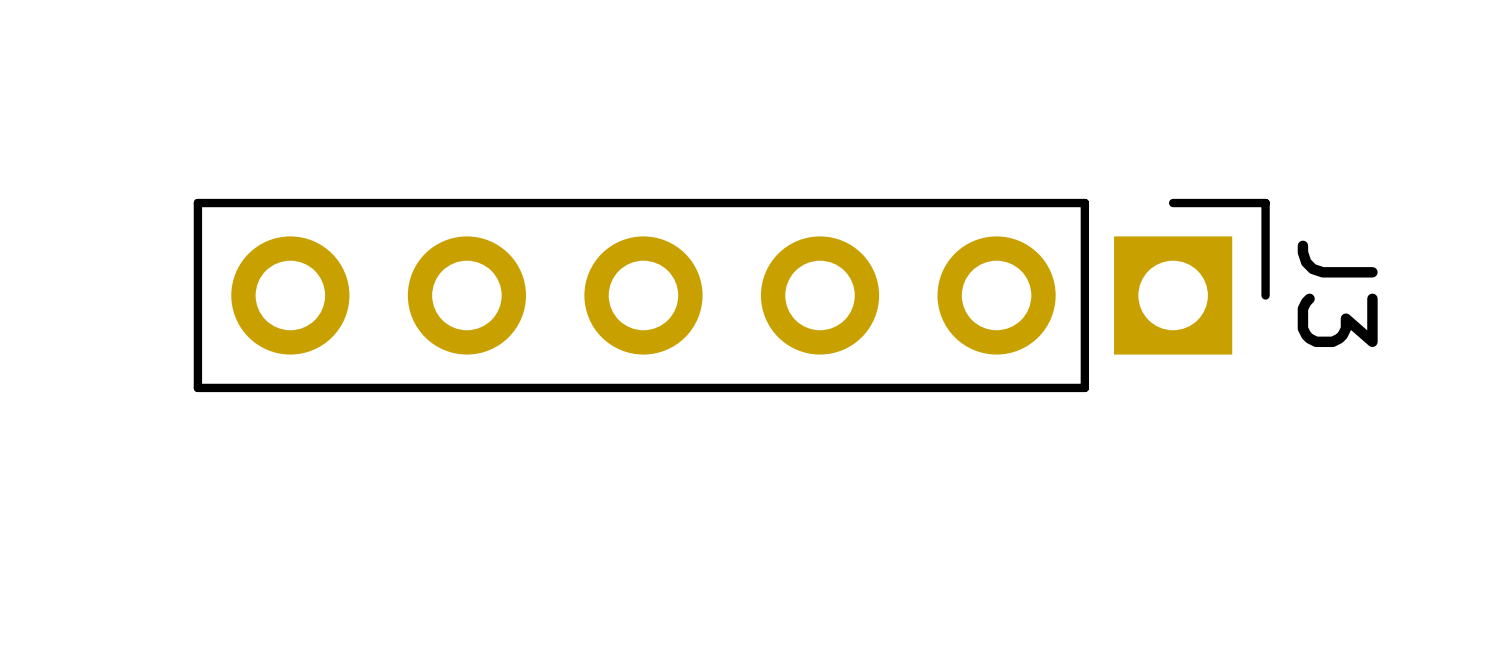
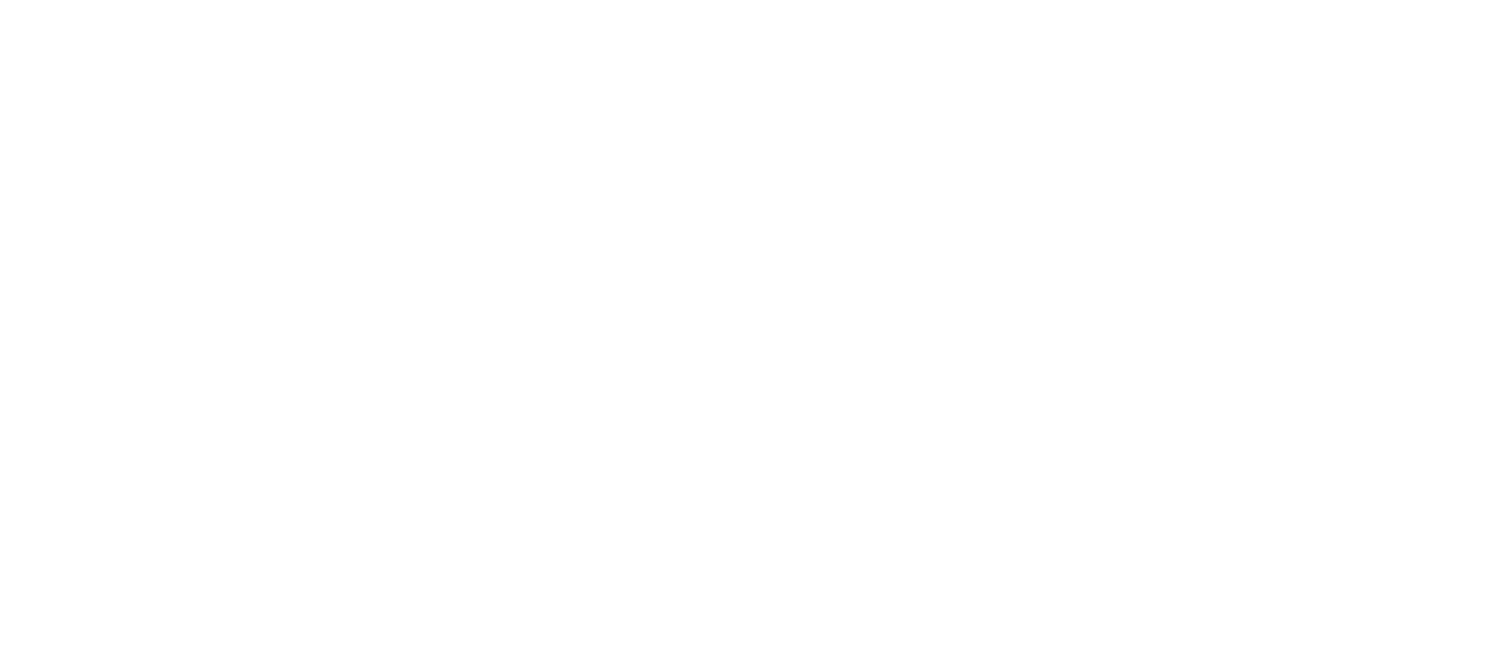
J3: (731, 295) -> none

